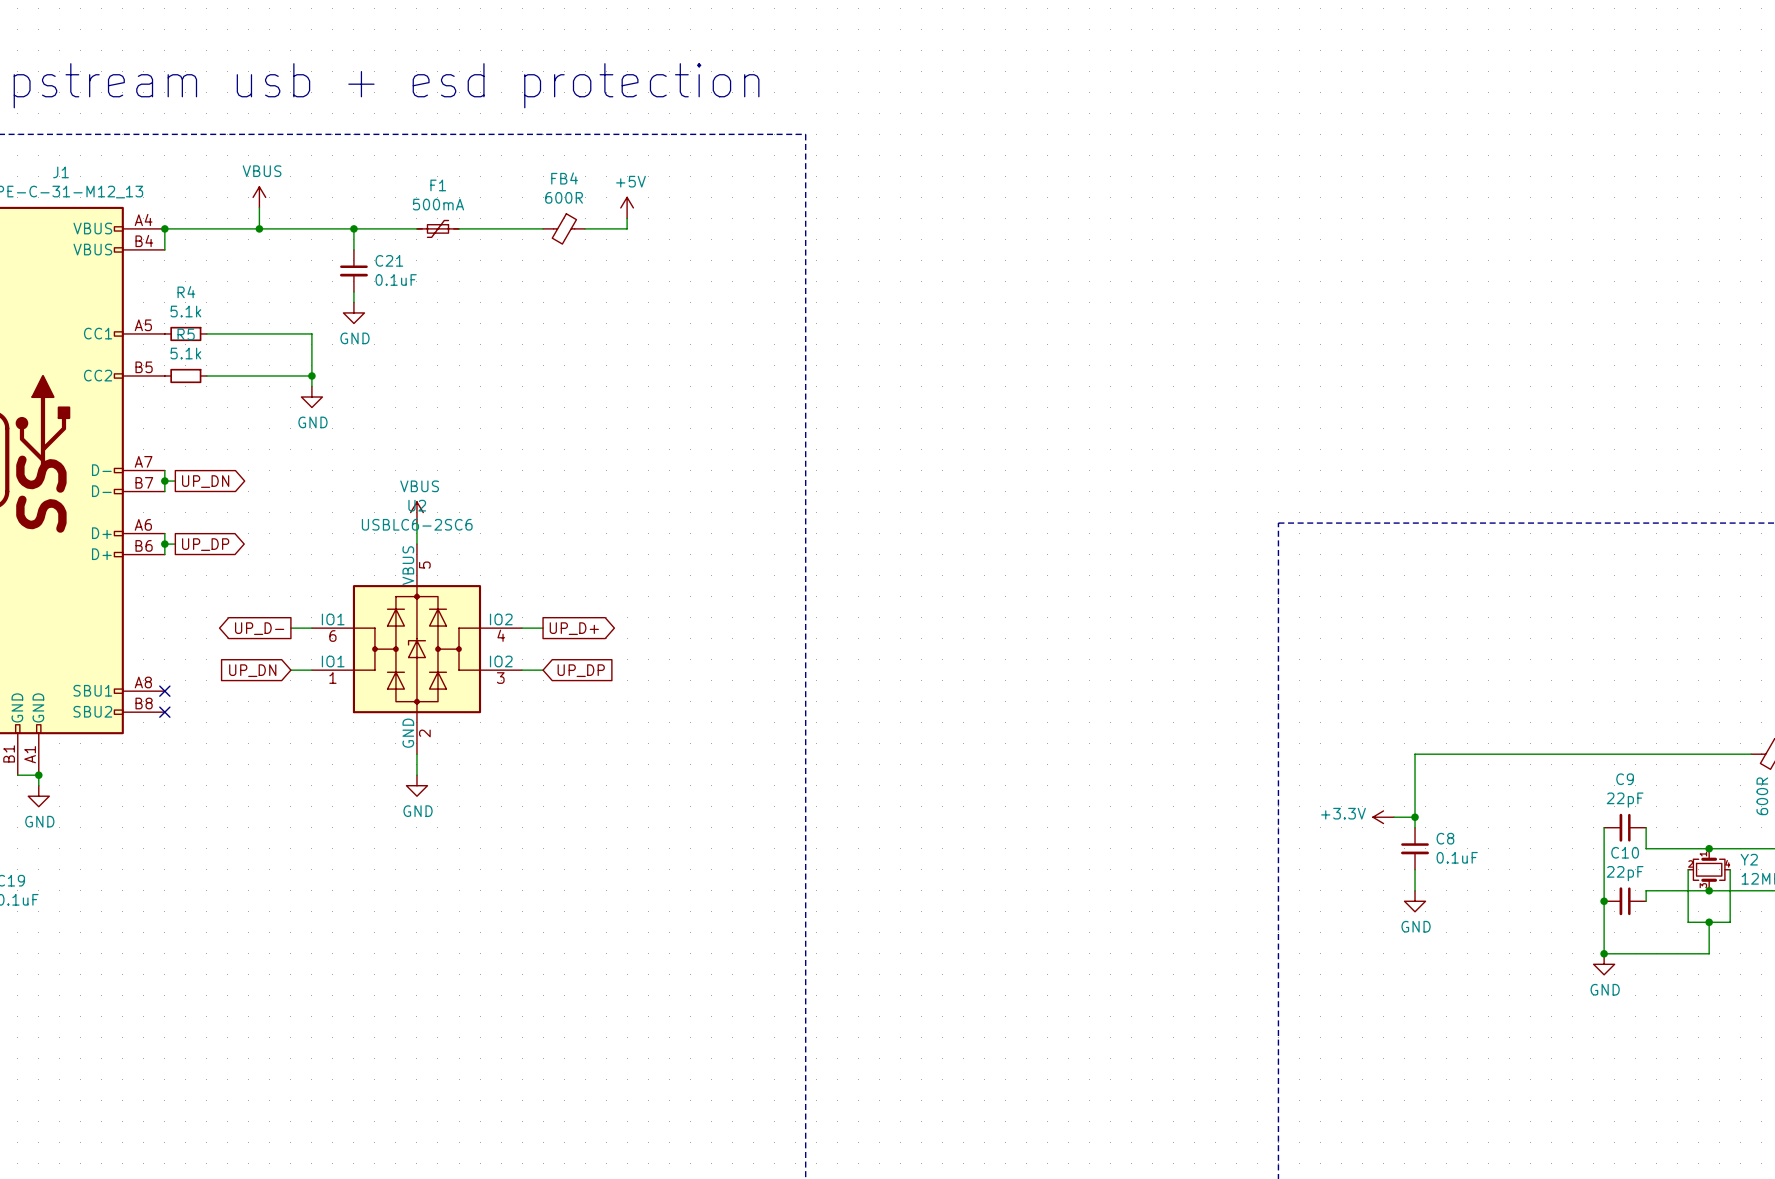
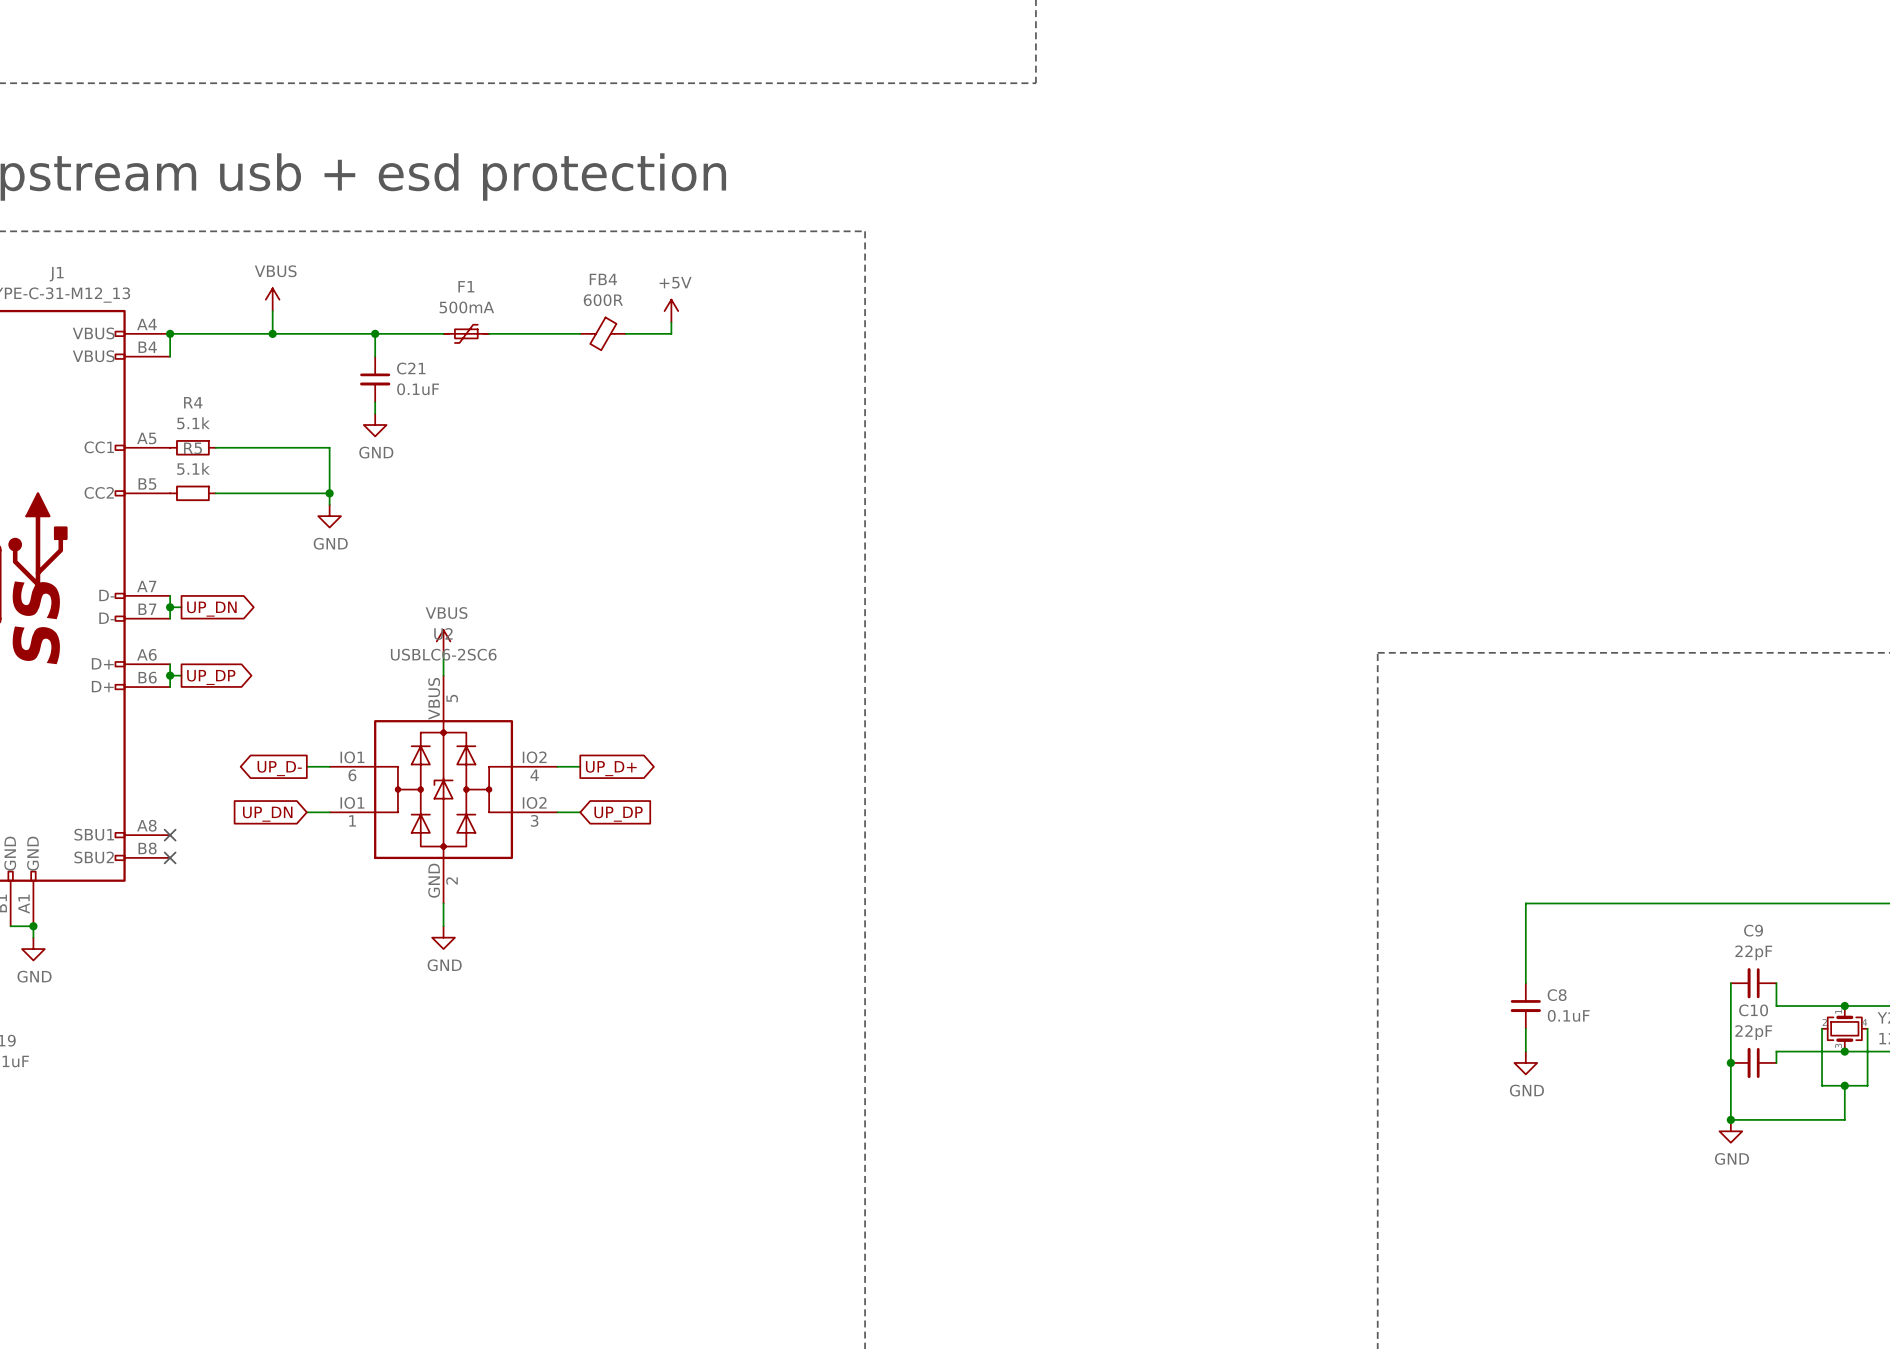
power symbol: +3.3V (1383, 817) -> none
wire: (1394, 817) (1415, 817) -> none
junction: (1415, 817) -> none

